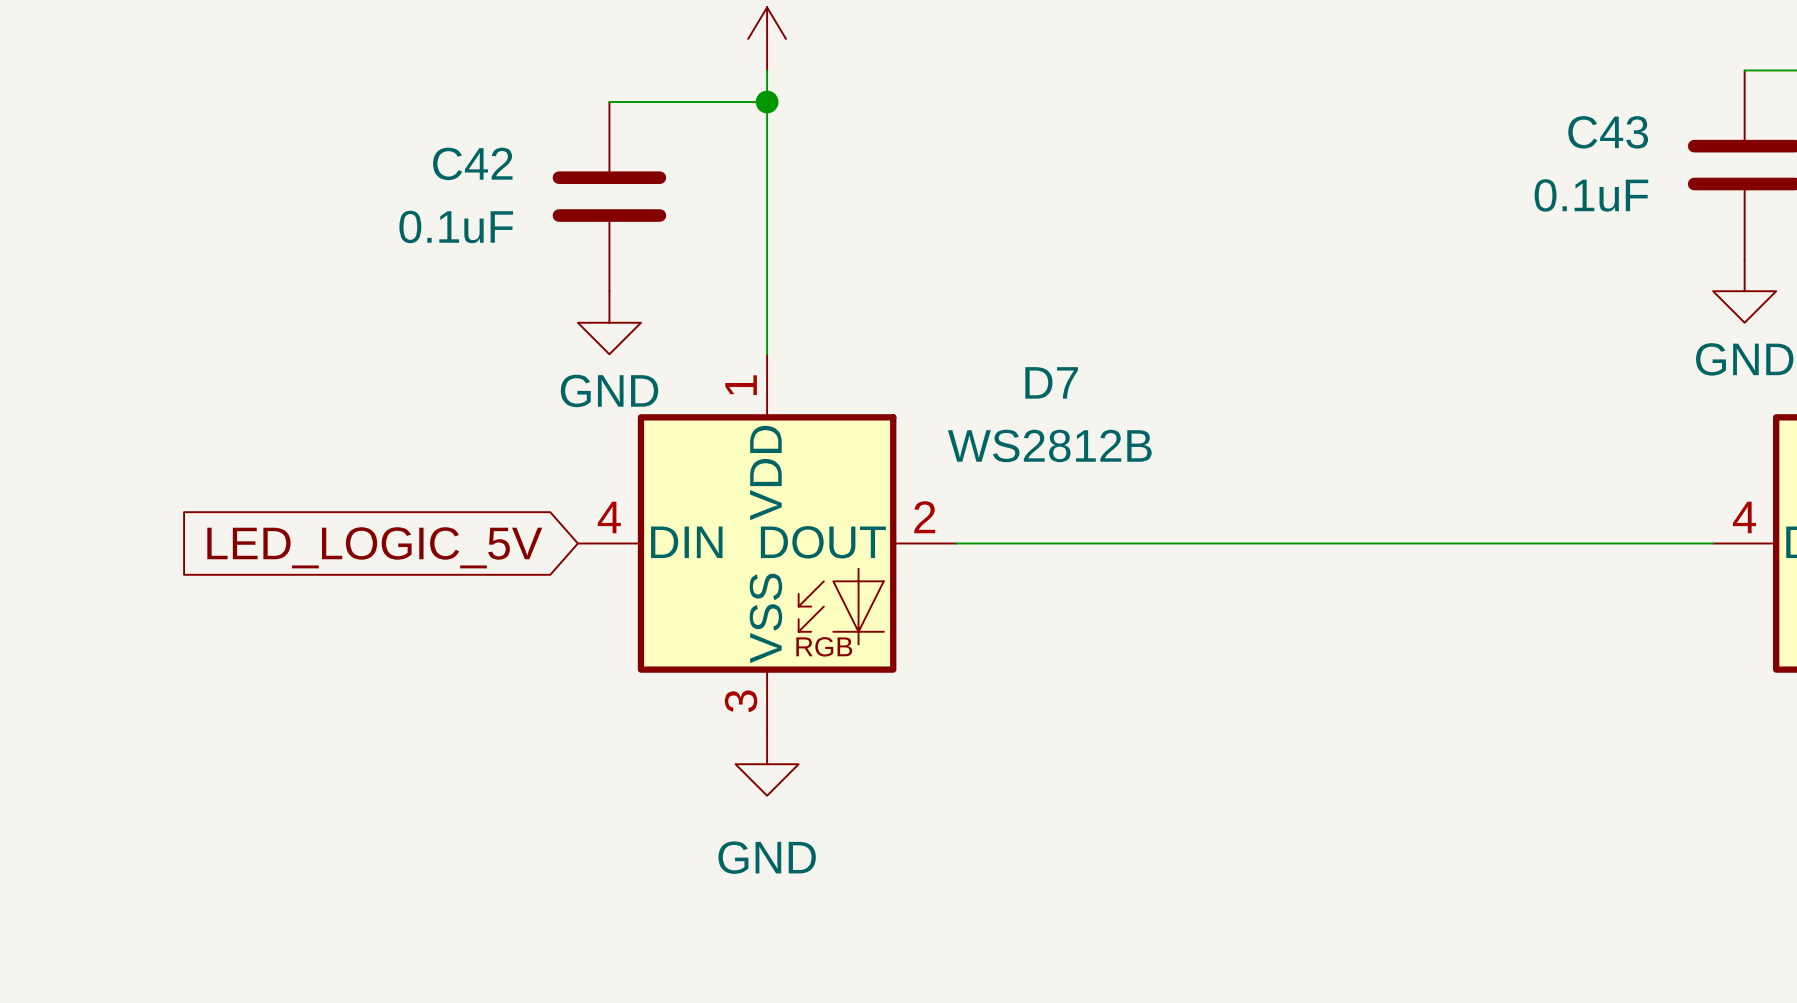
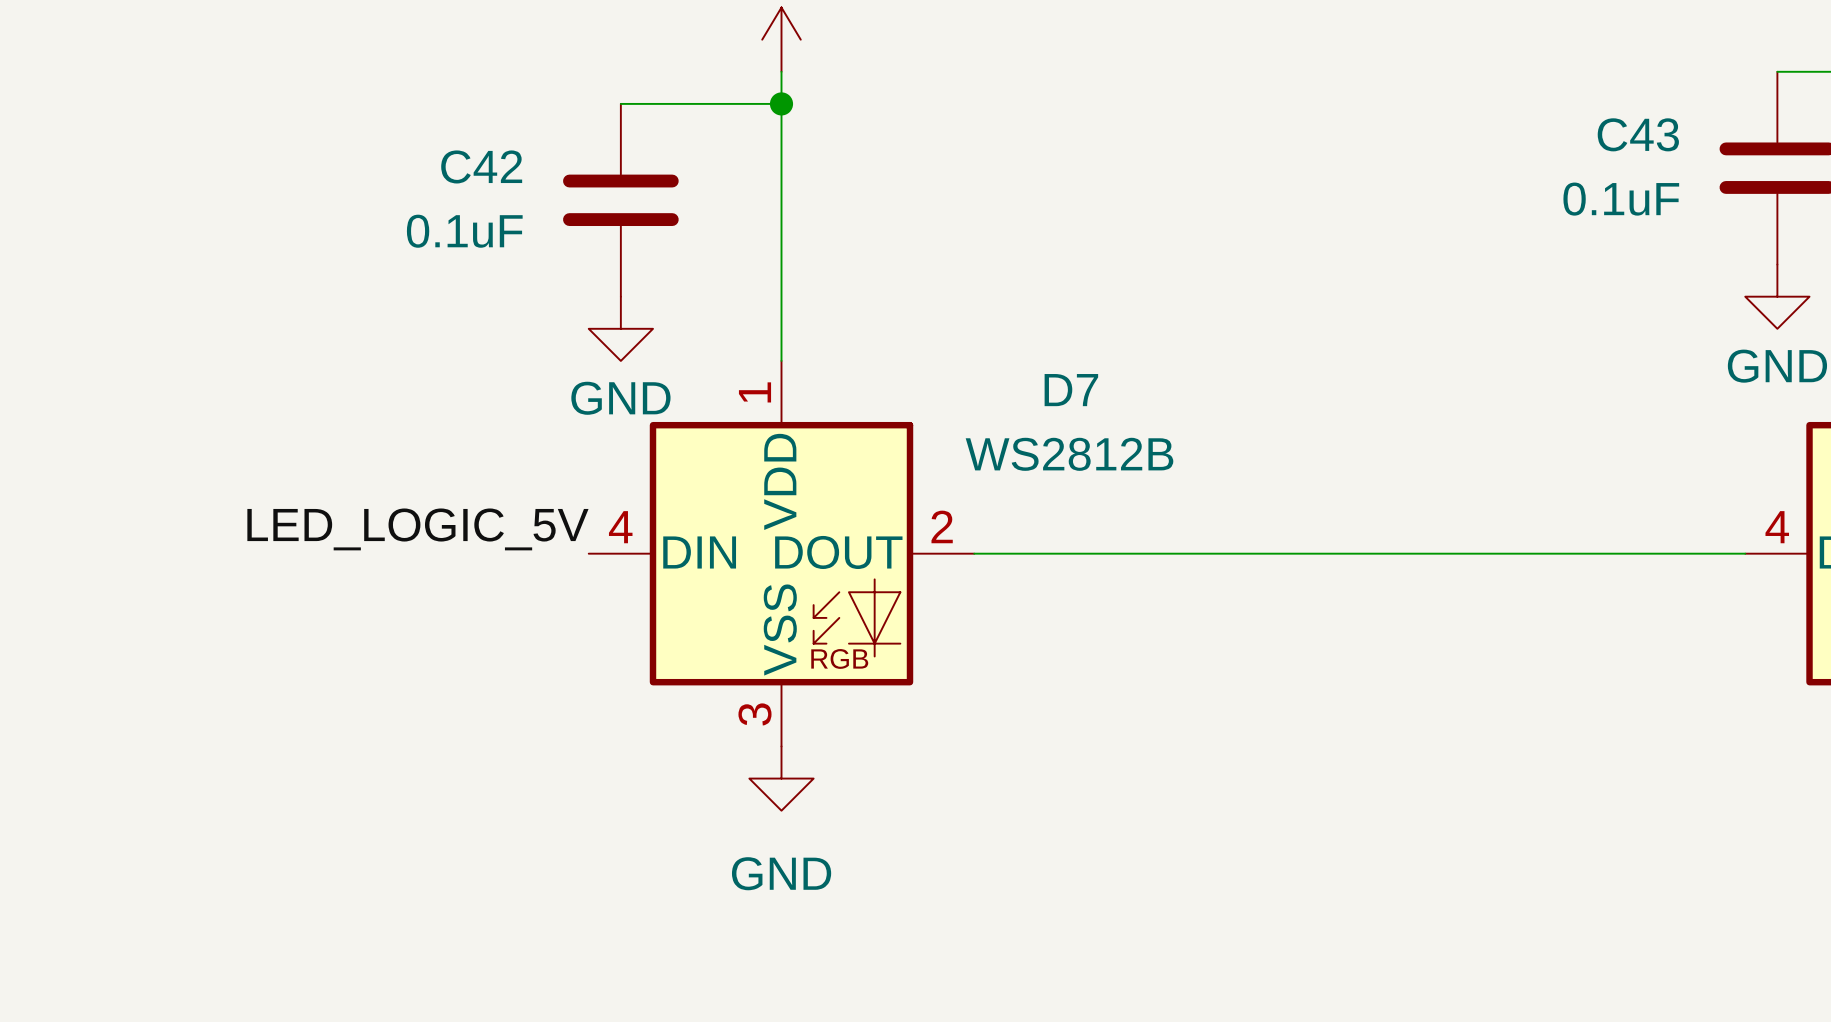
label: none -> LED_LOGIC_5V (417, 529)
global label: LED_LOGIC_5V (374, 547) -> none

